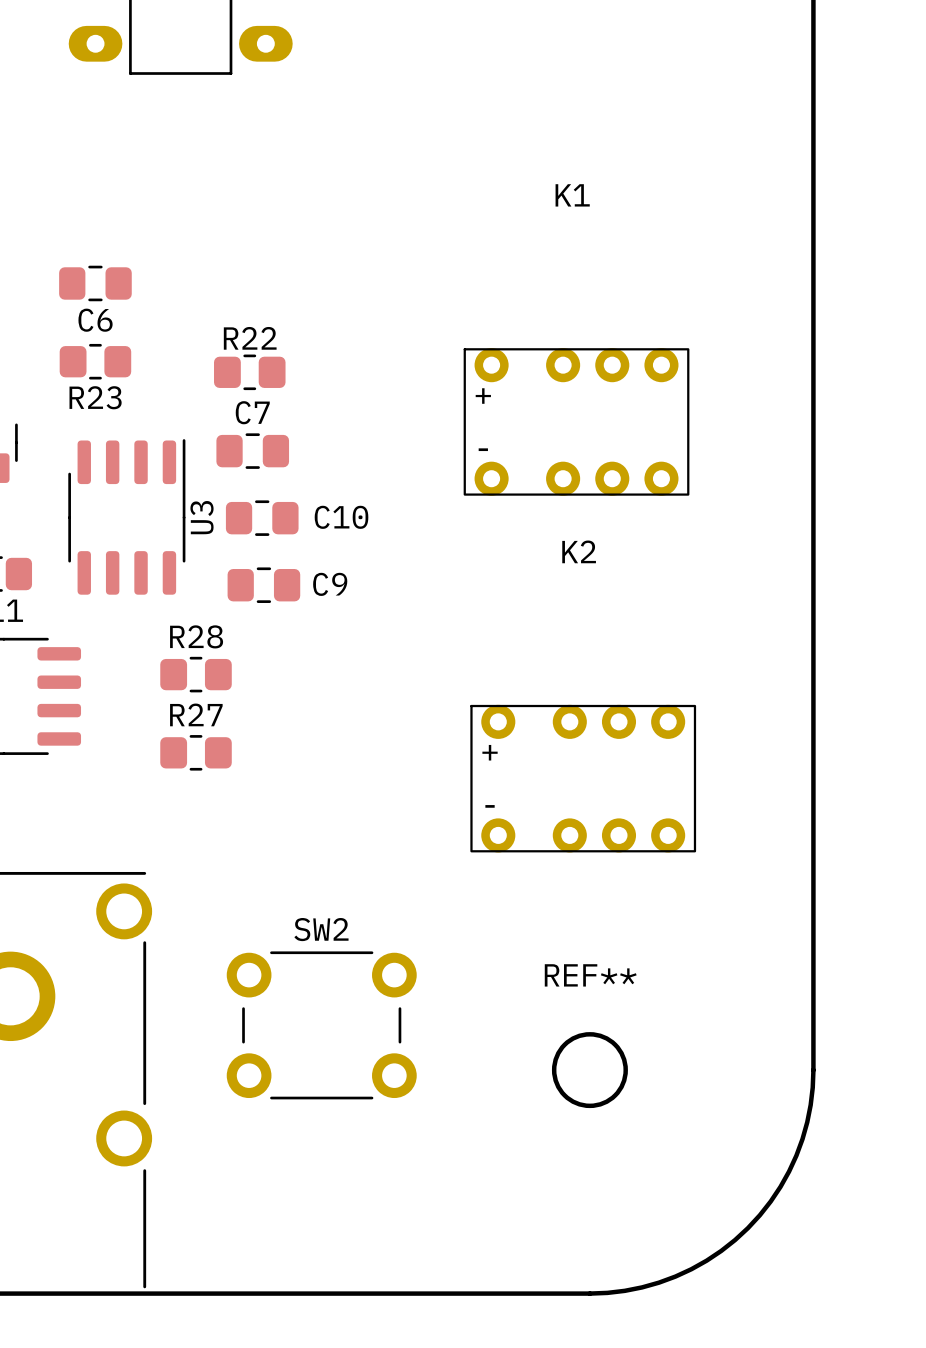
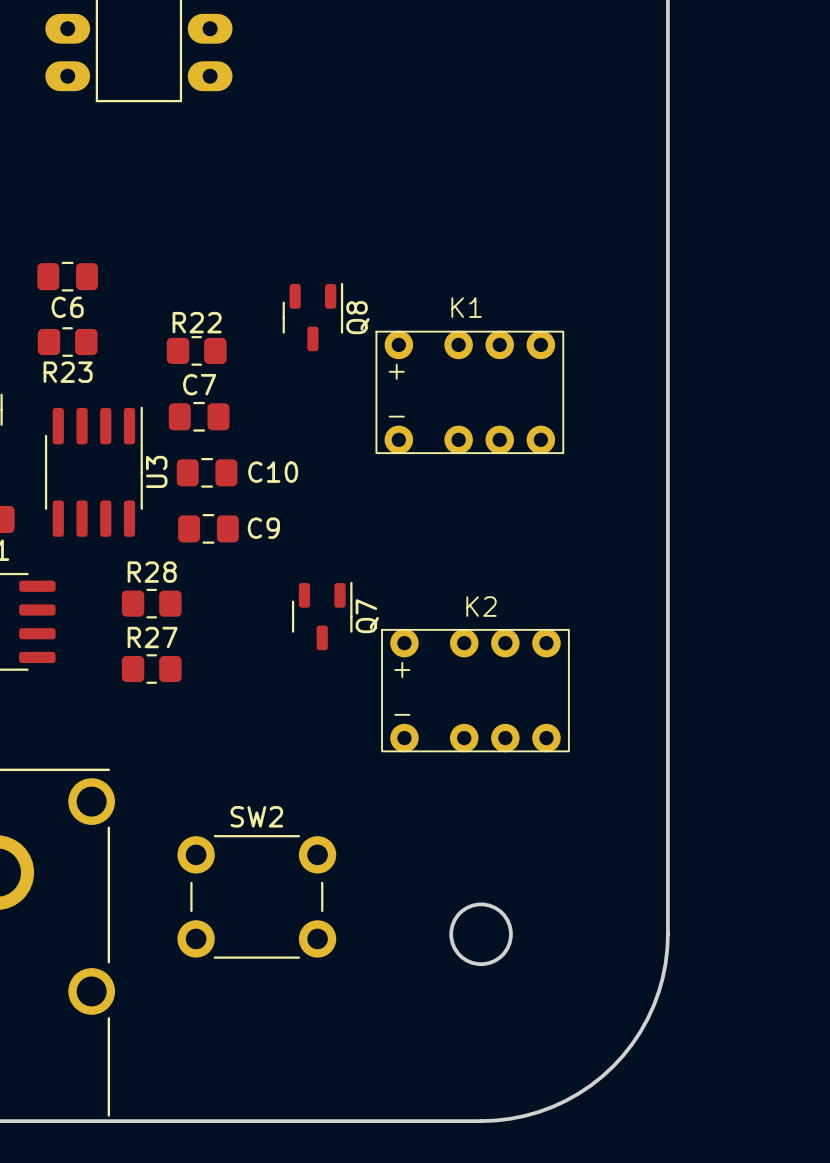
K1 name position: K1 (572, 195) -> K1 (466, 307)
Q8: none -> (312, 317)
K2 name position: K2 (579, 551) -> K2 (481, 606)
Q7: none -> (322, 616)
REF** name: REF** (590, 975) -> none

